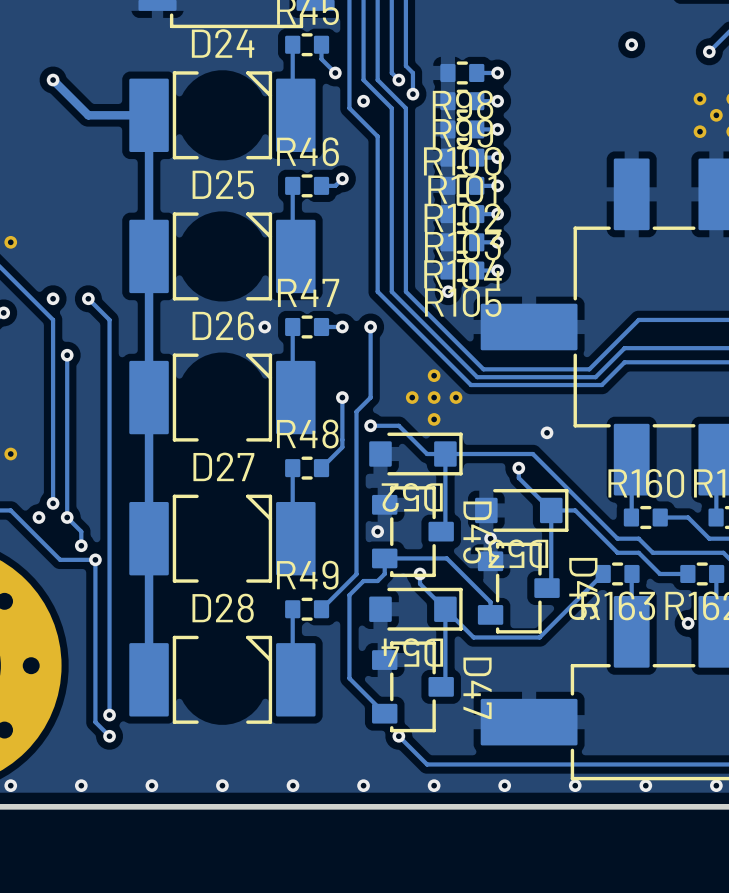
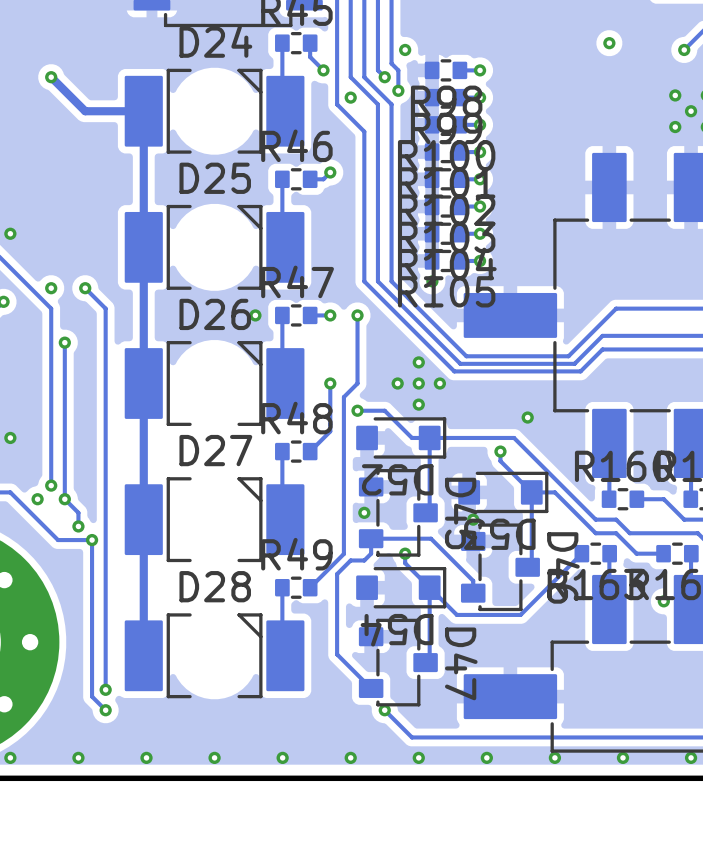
via: none -> (405, 49)

